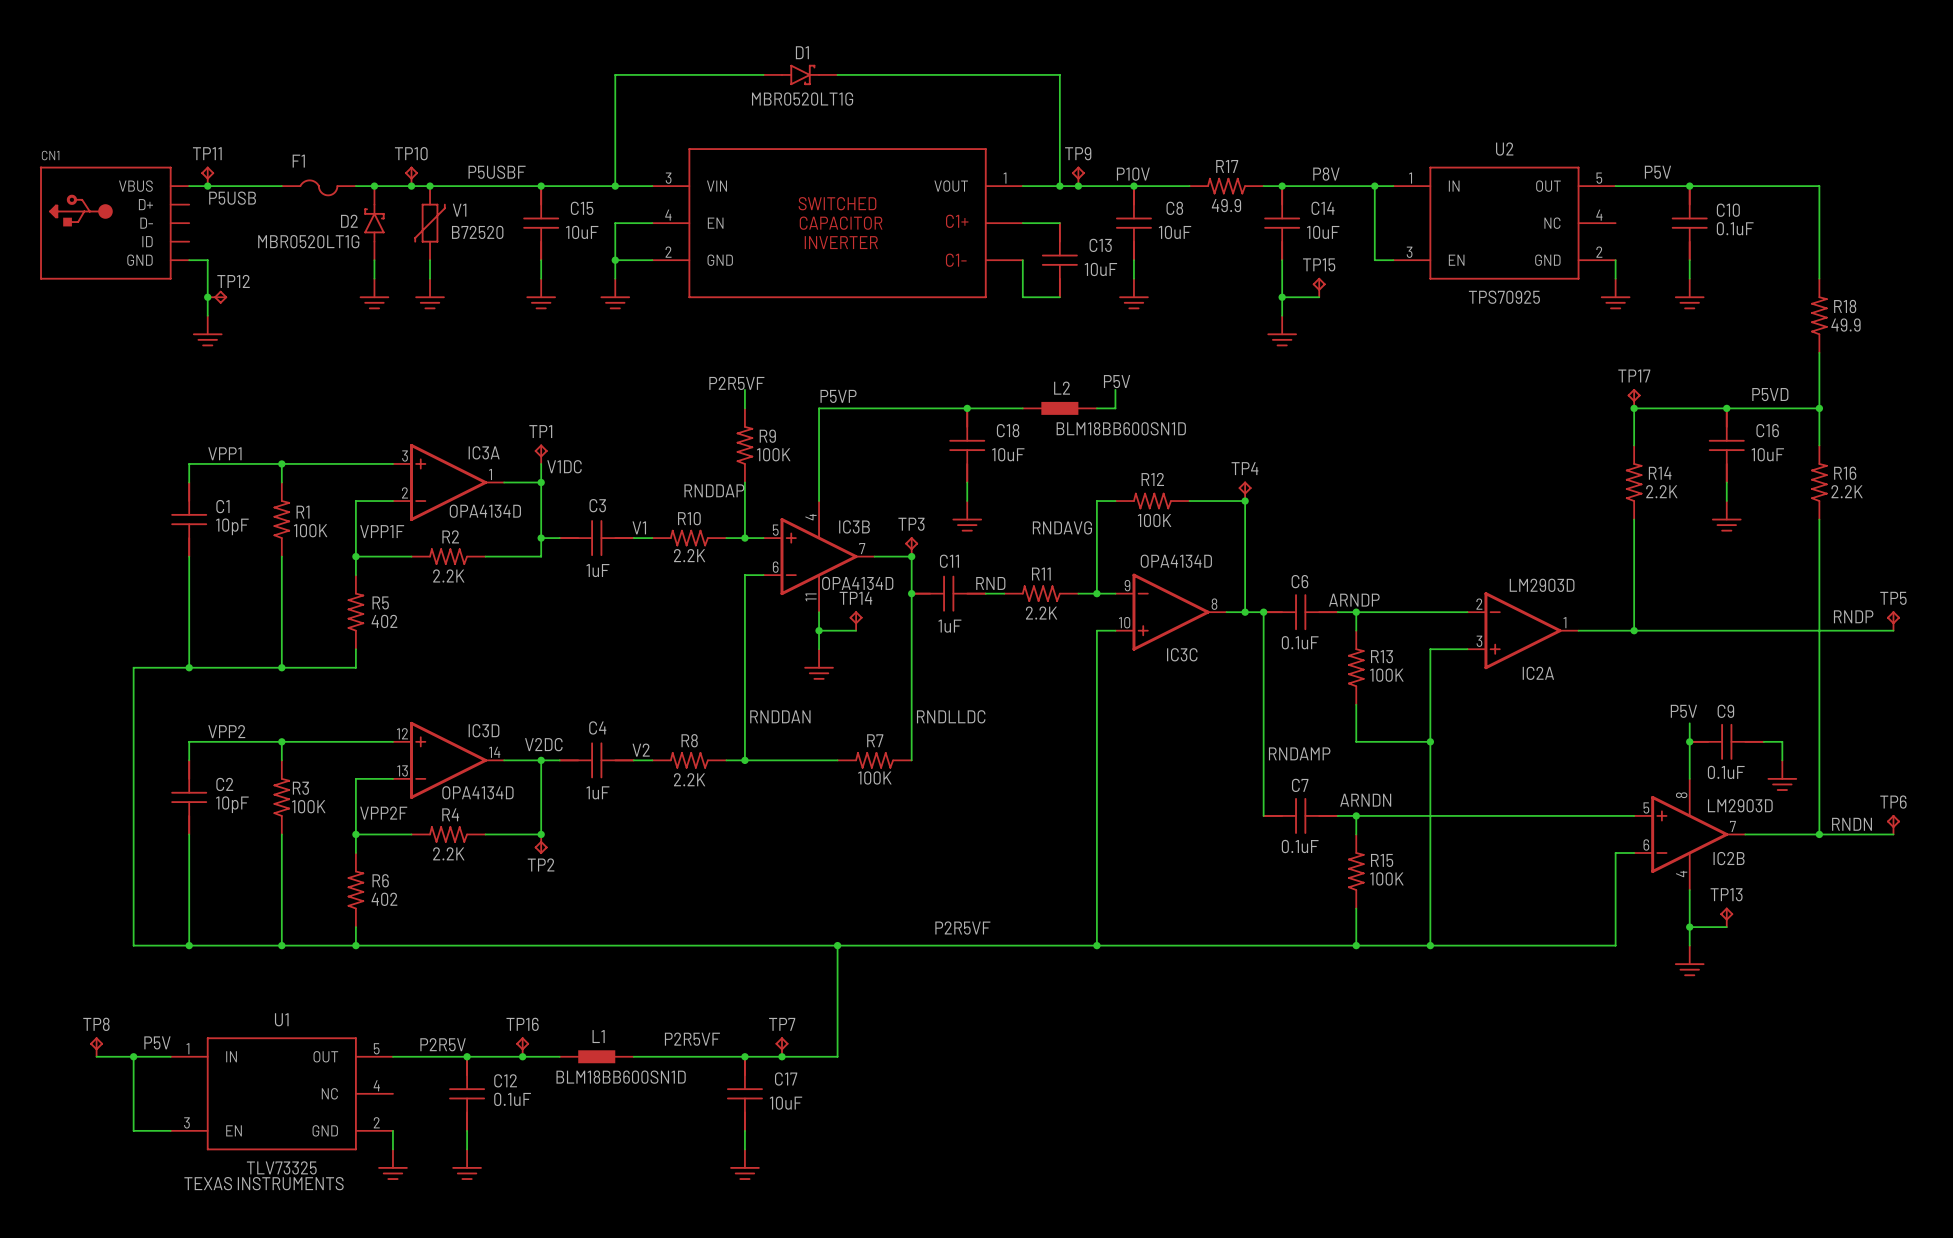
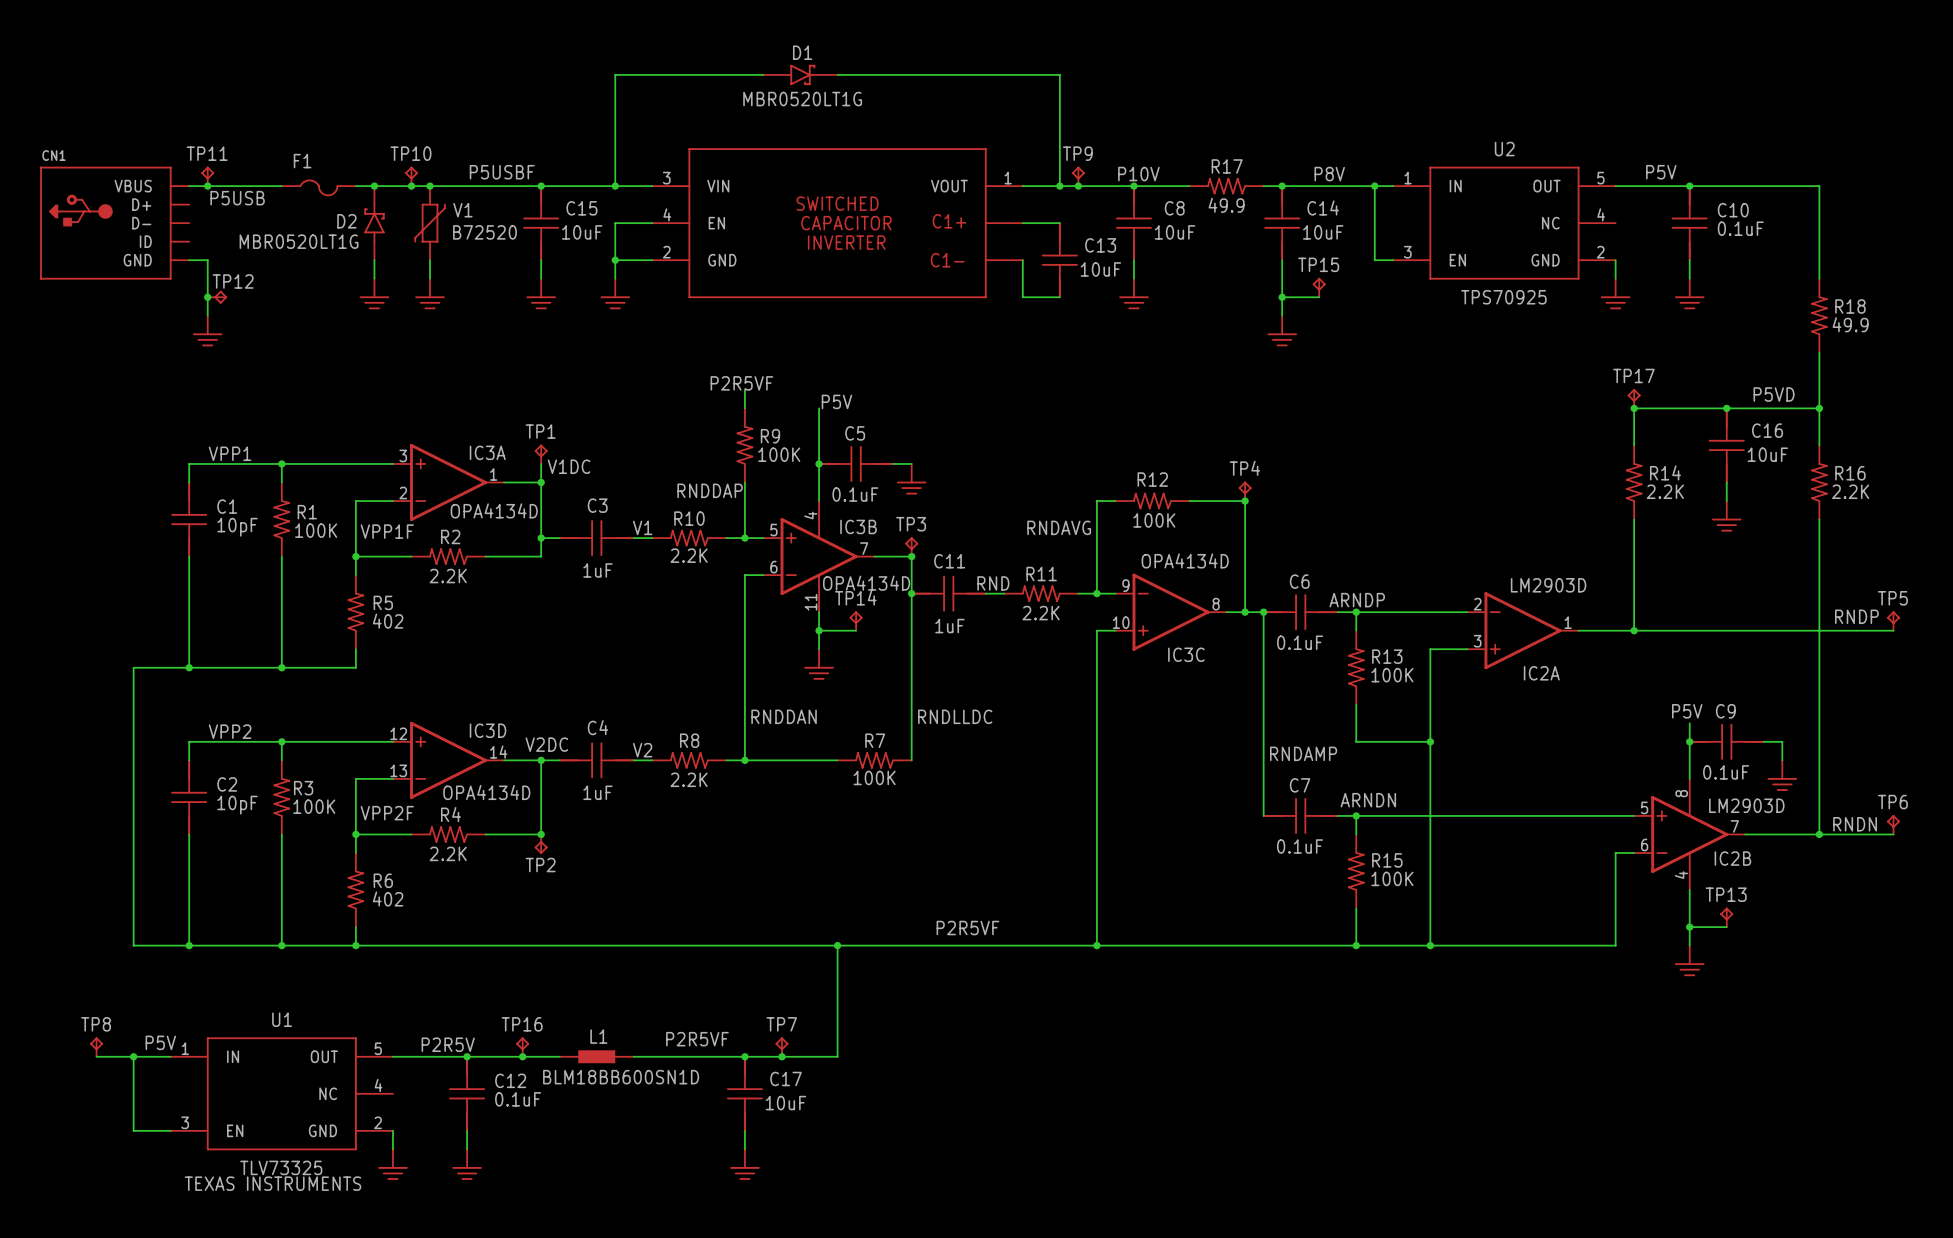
label: P5V (1117, 381) -> none
wire: (1115, 389) (1115, 408) (1096, 408) -> none
label: P5VP (838, 396) -> P5V (836, 401)
wire: (819, 408) (1022, 408) -> none
junction: (967, 408) -> none
L2: BLM18BB600SN1D (1059, 408) -> none
C18: 10uF (967, 445) -> none
junction: none -> (819, 463)
C5: none -> 0.1uF (856, 463)
wire: none -> (893, 463) (911, 463)
wire: (967, 482) (967, 501) -> none
power symbol position: (967, 516) -> (911, 479)

